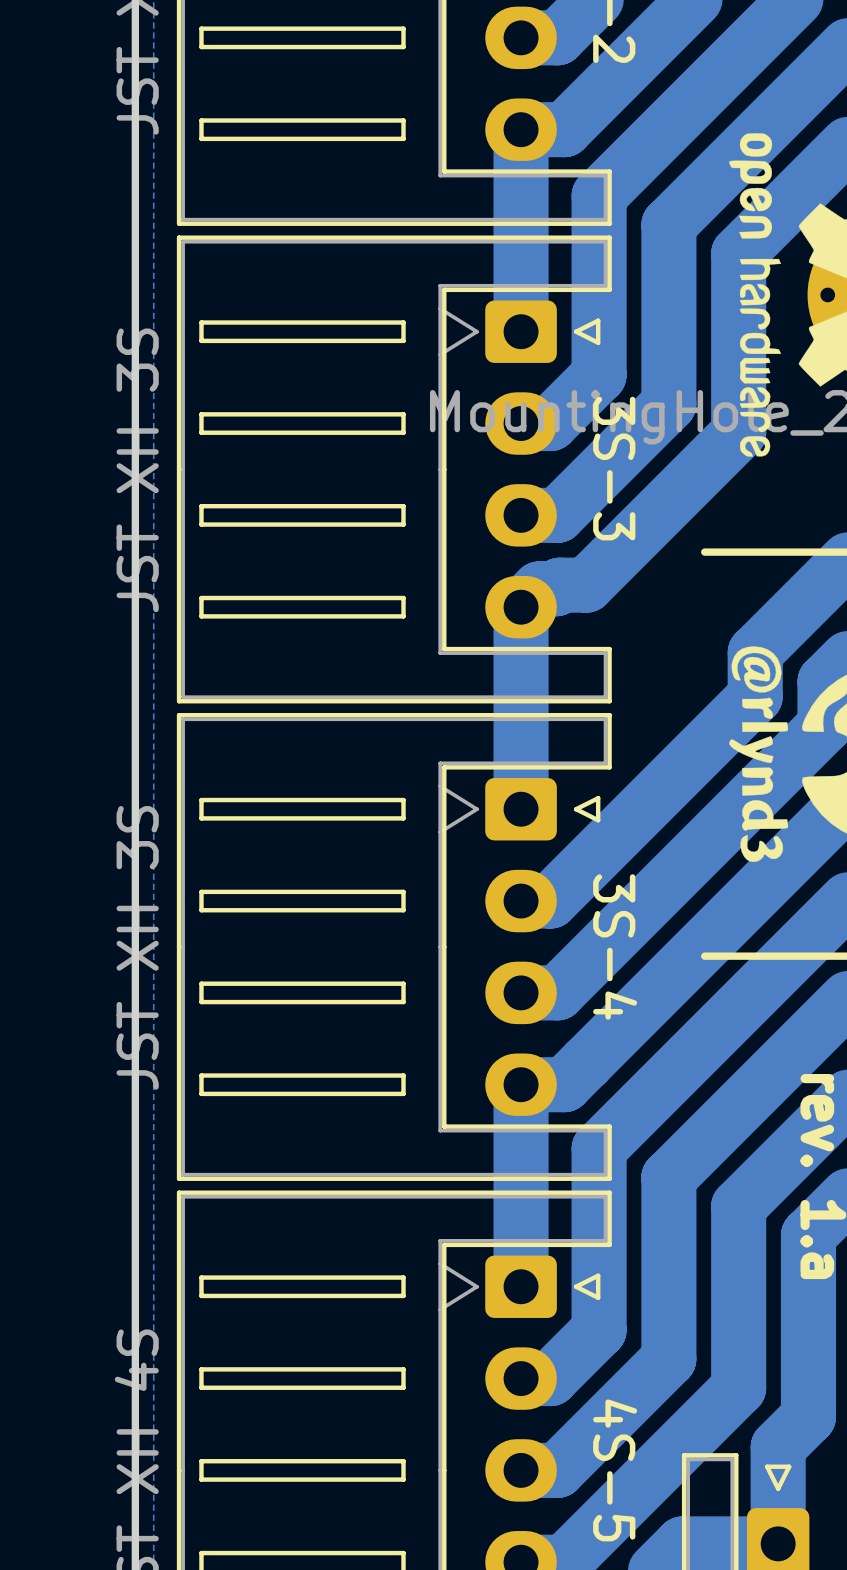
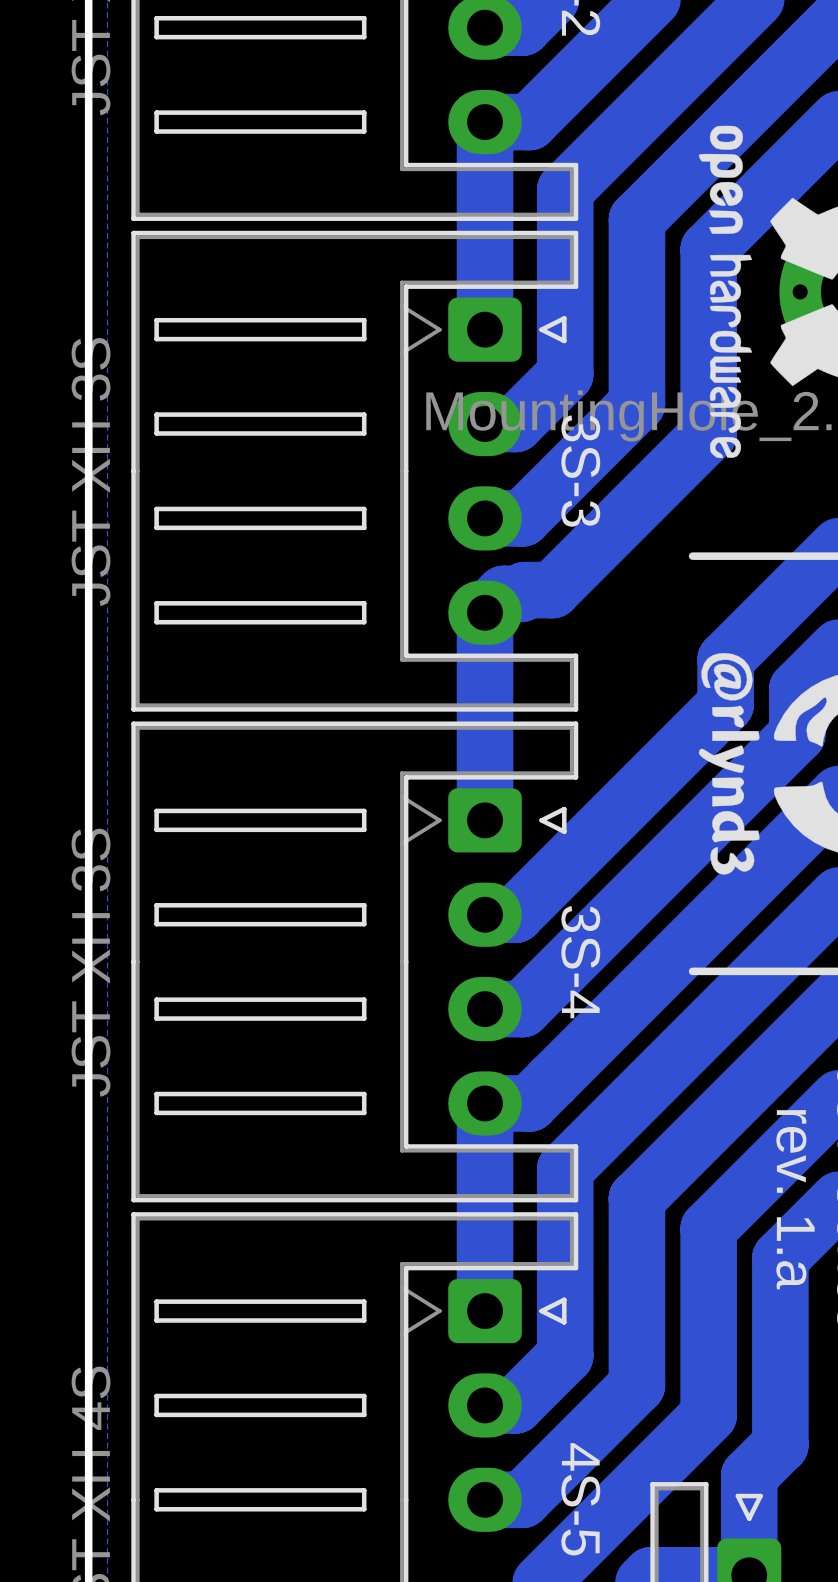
line: (704, 552) (723, 552) -> none
line: (704, 956) (723, 956) -> none

